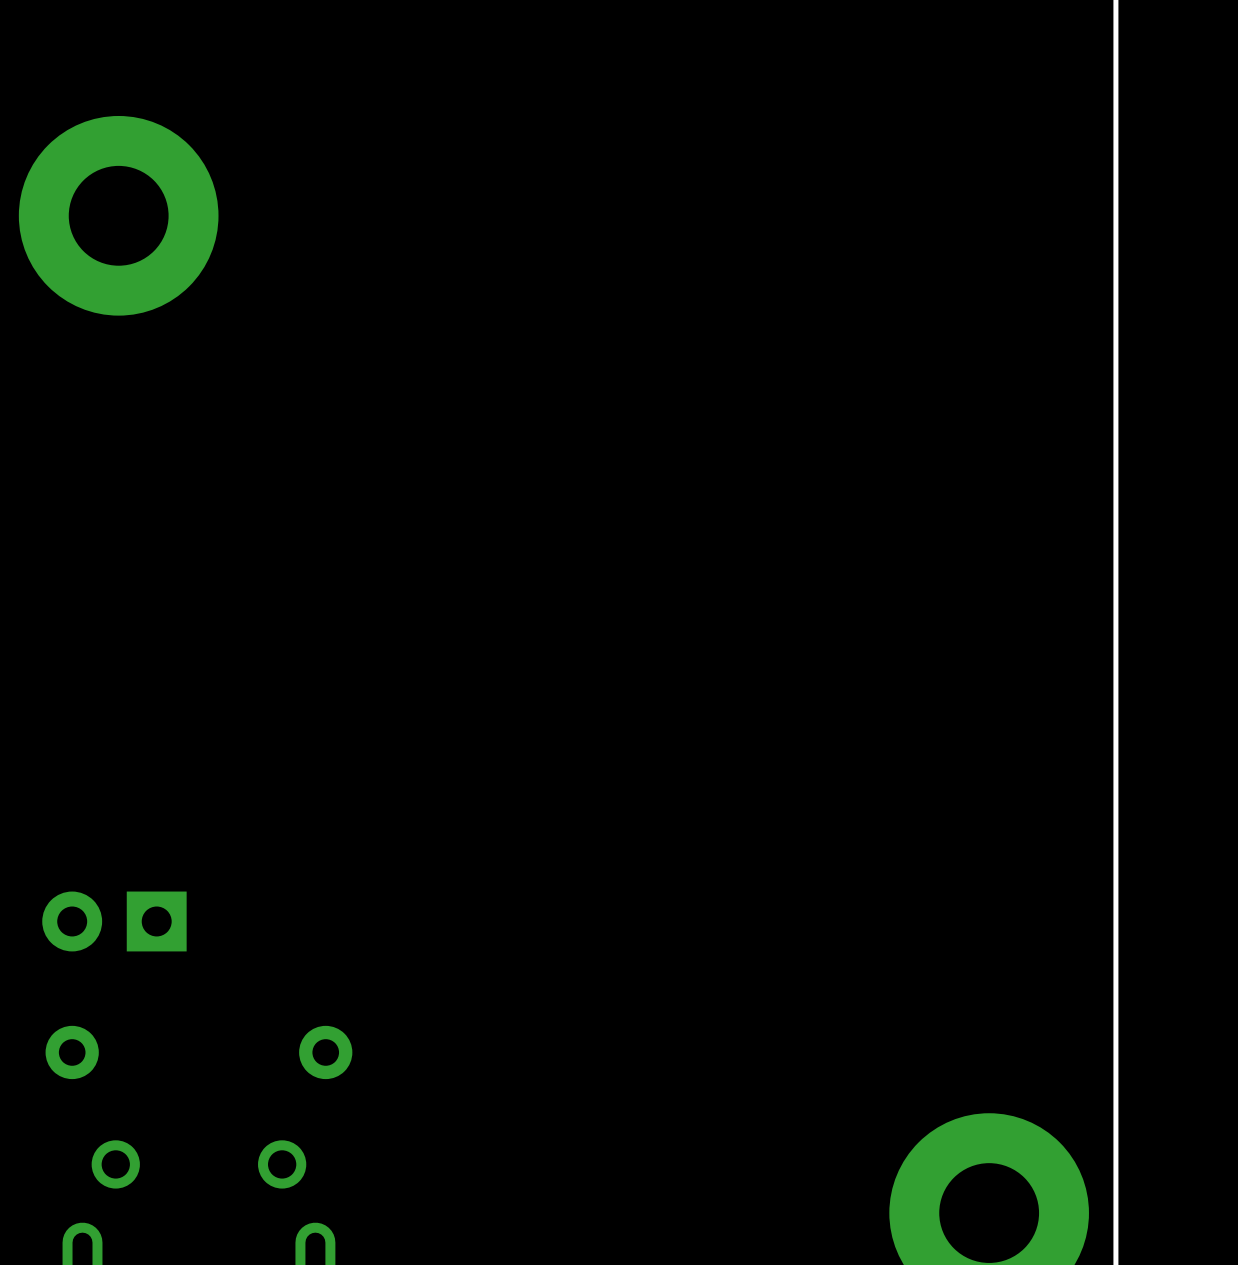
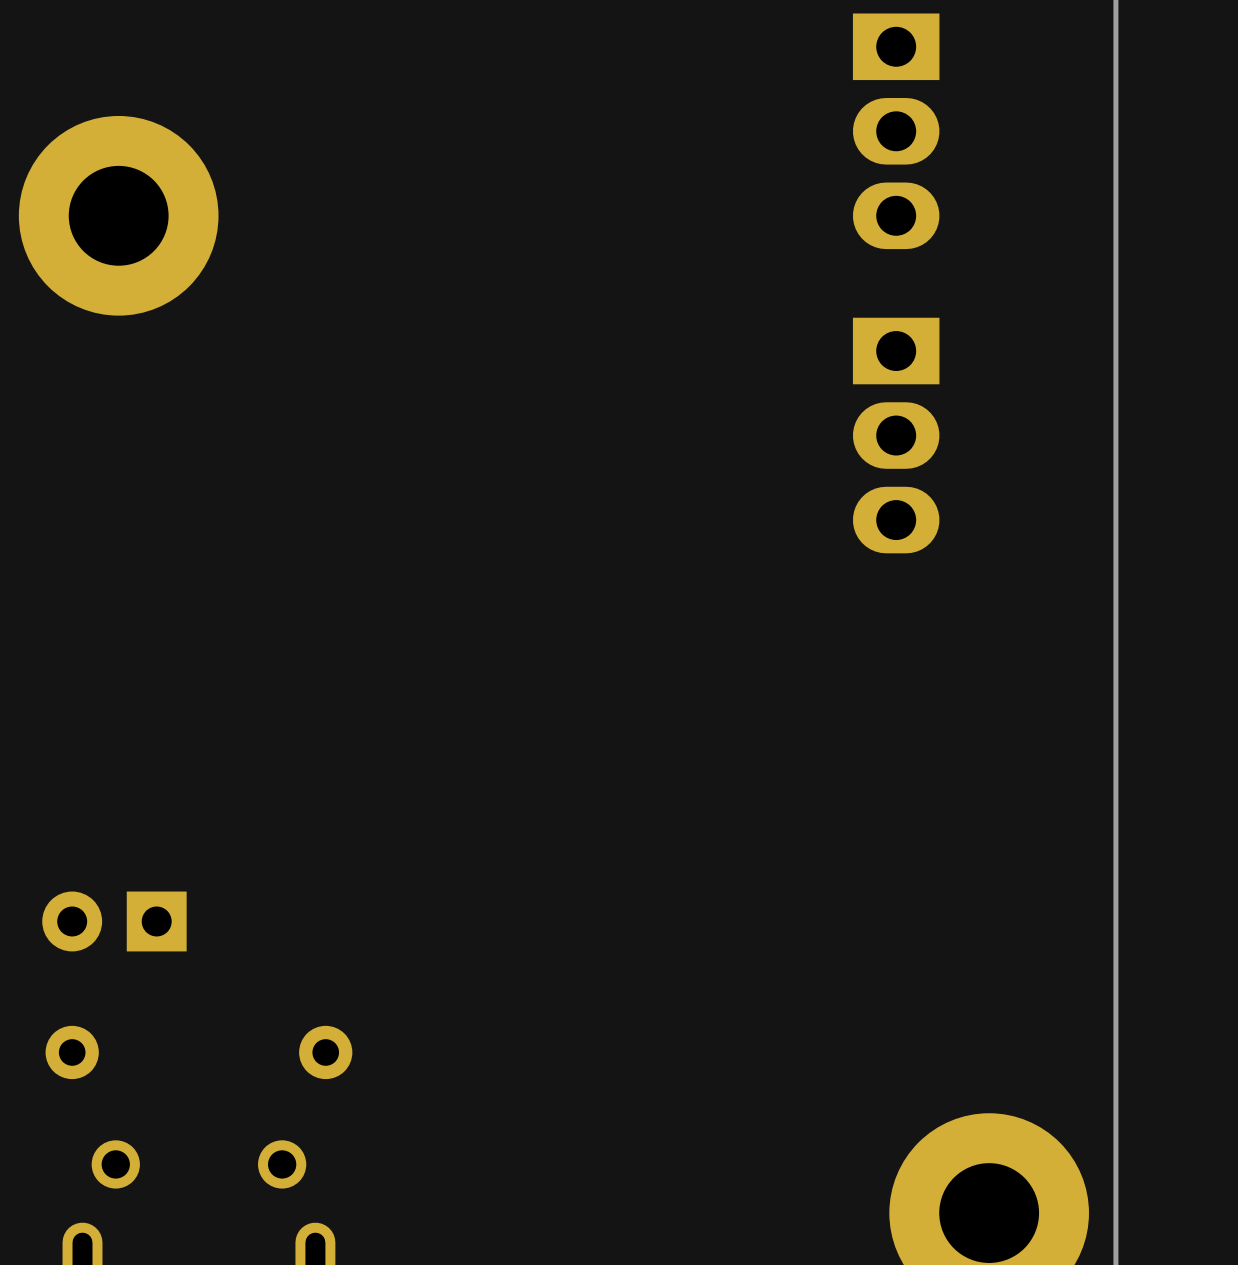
part: none -> (896, 131)
part: none -> (896, 435)

